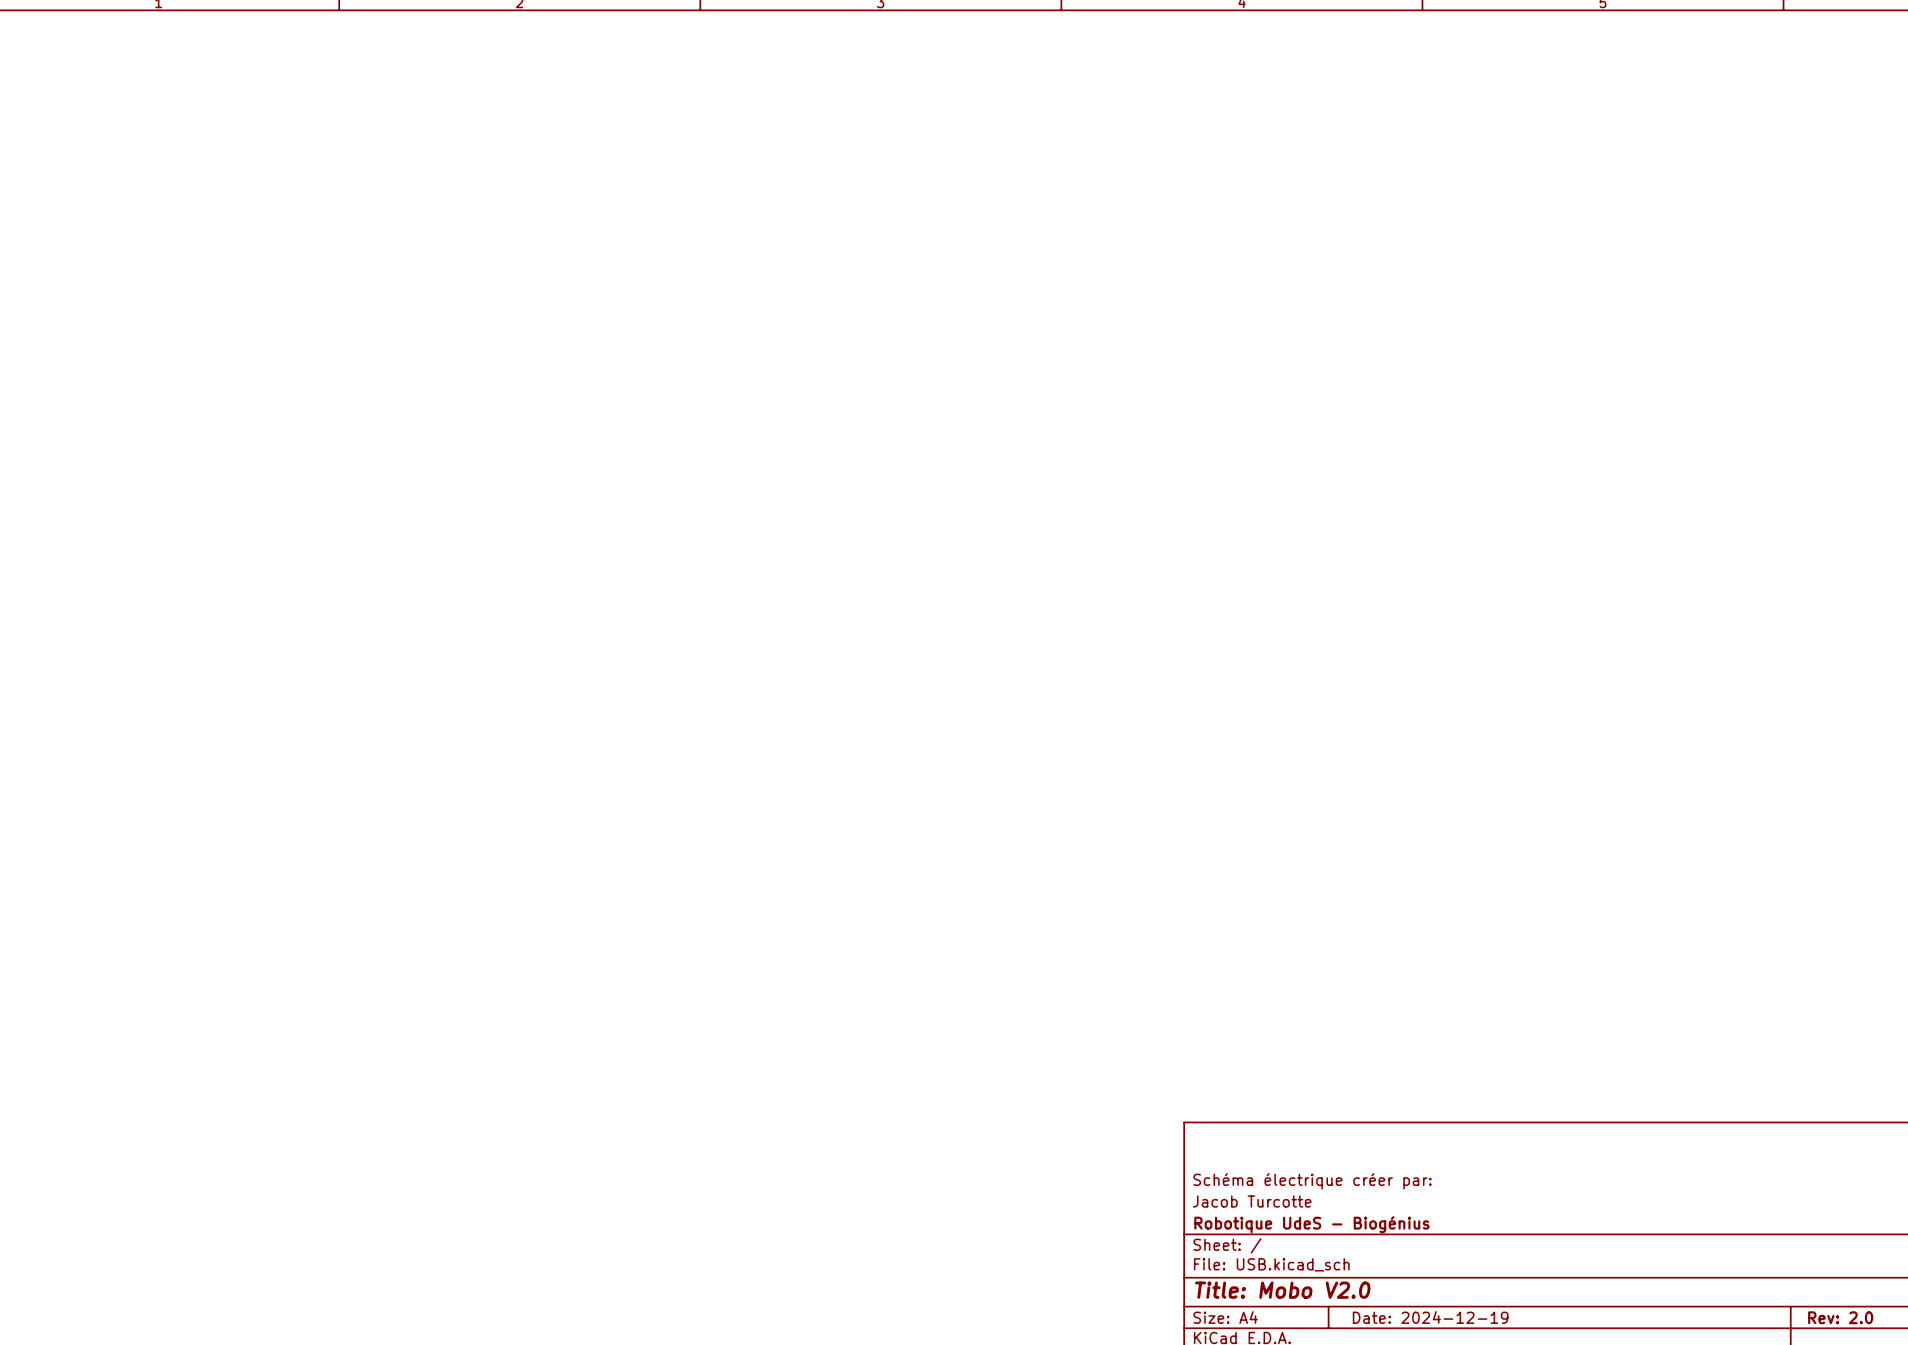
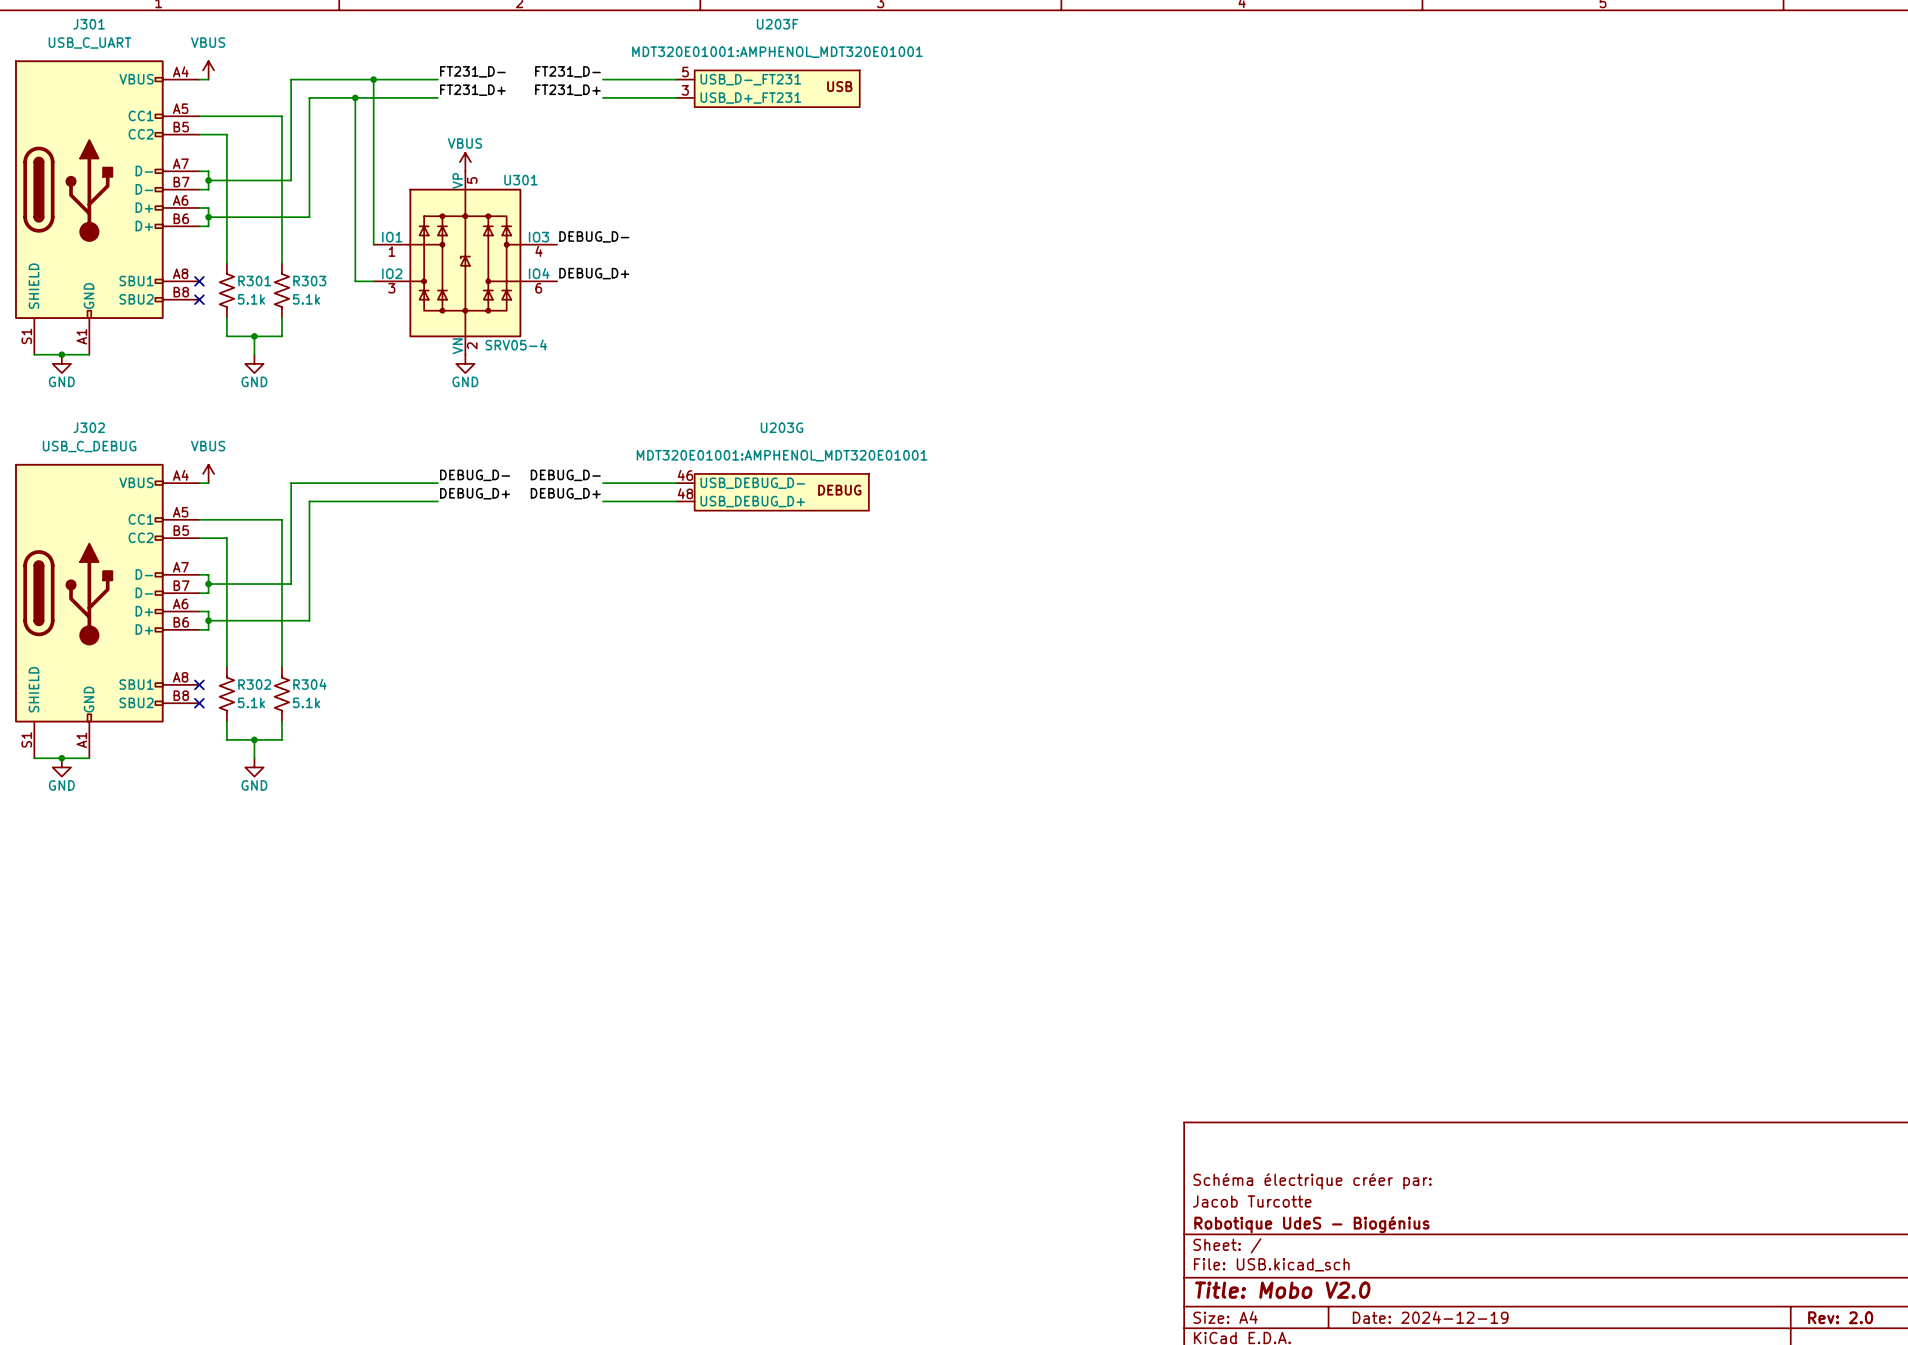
power symbol: none -> VBUS (208, 70)
label: none -> FT231_D- (472, 71)
label: none -> FT231_D- (567, 71)
wire: none -> (199, 79) (208, 79)
wire: none -> (373, 79) (373, 244)
junction: none -> (373, 79)
wire: none -> (437, 79) (291, 79) (291, 180) (208, 180)
wire: none -> (602, 79) (676, 79)
U203F: none -> (768, 88)
label: none -> FT231_D+ (472, 90)
label: none -> FT231_D+ (567, 90)
wire: none -> (355, 97) (355, 281) (373, 281)
junction: none -> (355, 97)
wire: none -> (437, 97) (309, 97) (309, 217) (208, 217)
wire: none -> (602, 97) (676, 97)
wire: none -> (199, 116) (281, 116) (281, 263)
wire: none -> (199, 134) (226, 134) (226, 263)
power symbol: none -> VBUS (465, 162)
wire: none -> (199, 171) (208, 171) (208, 189) (199, 189)
junction: none -> (208, 180)
J301: none -> USB_C_UART (107, 207)
wire: none -> (199, 207) (208, 207) (208, 226) (199, 226)
junction: none -> (208, 217)
label: none -> DEBUG_D- (594, 236)
U301: none -> SRV05-4 (465, 263)
label: none -> DEBUG_D+ (594, 273)
no-connect mark: none -> (199, 281)
R301: none -> 5.1k (226, 290)
R303: none -> 5.1k (281, 290)
no-connect mark: none -> (199, 299)
wire: none -> (226, 318) (226, 336) (281, 336) (281, 318)
wire: none -> (254, 336) (254, 354)
junction: none -> (254, 336)
wire: none -> (34, 354) (89, 354)
junction: none -> (61, 354)
power symbol: none -> GND (61, 363)
power symbol: none -> GND (254, 363)
power symbol: none -> GND (465, 363)
power symbol: none -> VBUS (208, 473)
label: none -> DEBUG_D- (475, 475)
label: none -> DEBUG_D- (565, 475)
wire: none -> (199, 483) (208, 483)
wire: none -> (437, 483) (291, 483) (291, 584) (208, 584)
wire: none -> (602, 483) (676, 483)
U203G: none -> (772, 492)
label: none -> DEBUG_D+ (475, 493)
label: none -> DEBUG_D+ (565, 493)
wire: none -> (437, 501) (309, 501) (309, 620) (208, 620)
wire: none -> (602, 501) (676, 501)
wire: none -> (199, 519) (281, 519) (281, 666)
wire: none -> (199, 538) (226, 538) (226, 666)
wire: none -> (199, 574) (208, 574) (208, 593) (199, 593)
junction: none -> (208, 584)
J302: none -> USB_C_DEBUG (107, 611)
wire: none -> (199, 611) (208, 611) (208, 629) (199, 629)
junction: none -> (208, 620)
no-connect mark: none -> (199, 684)
R302: none -> 5.1k (226, 694)
R304: none -> 5.1k (281, 694)
no-connect mark: none -> (199, 703)
wire: none -> (226, 721) (226, 739) (281, 739) (281, 721)
wire: none -> (254, 739) (254, 758)
junction: none -> (254, 739)
wire: none -> (34, 758) (89, 758)
junction: none -> (61, 758)
power symbol: none -> GND (61, 767)
power symbol: none -> GND (254, 767)

